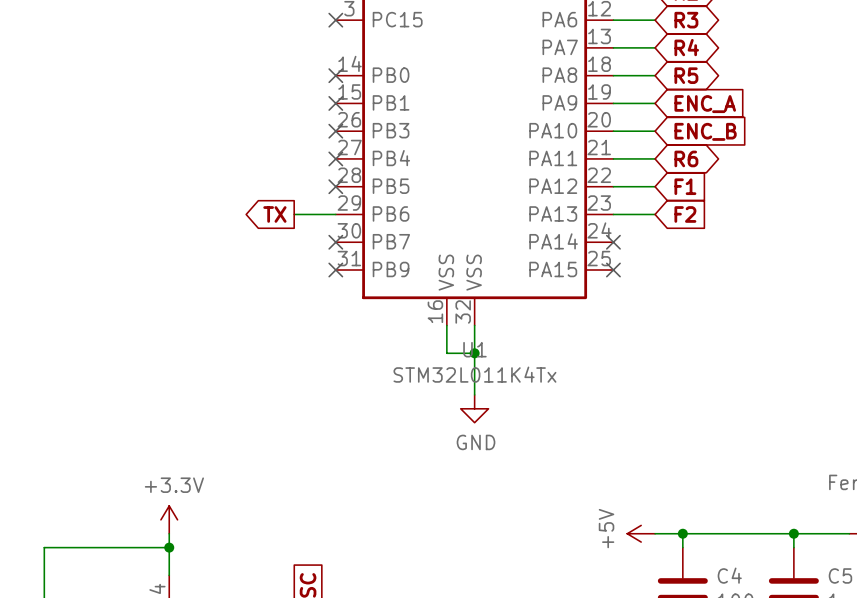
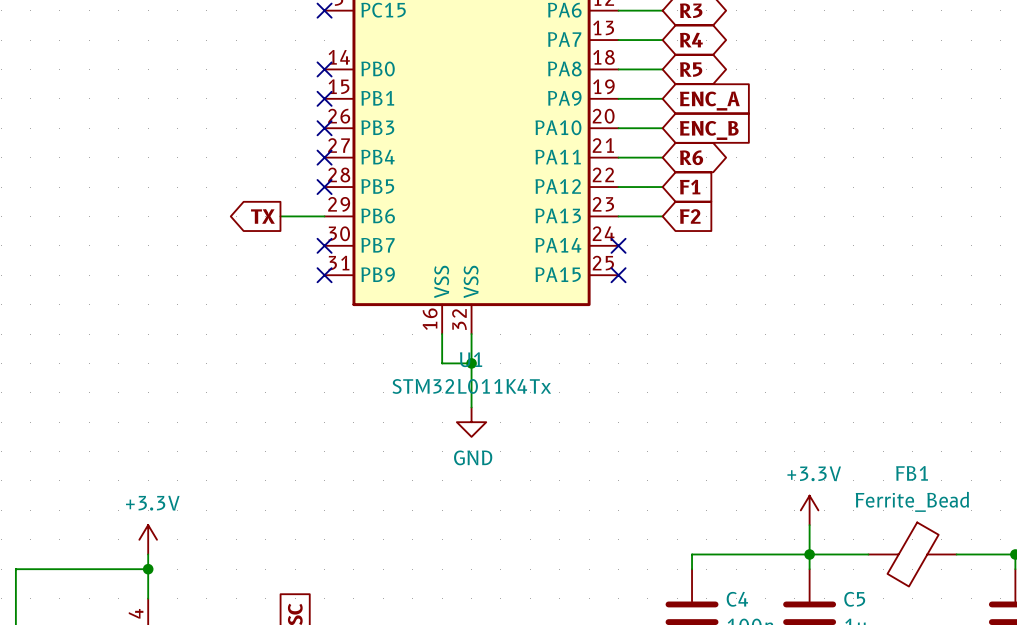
power symbol: none -> +3.3V (809, 510)
wire: none -> (809, 525) (809, 554)
power symbol: +5V (641, 533) -> none
wire: (655, 533) (682, 533) -> none
junction: (682, 533) -> none

